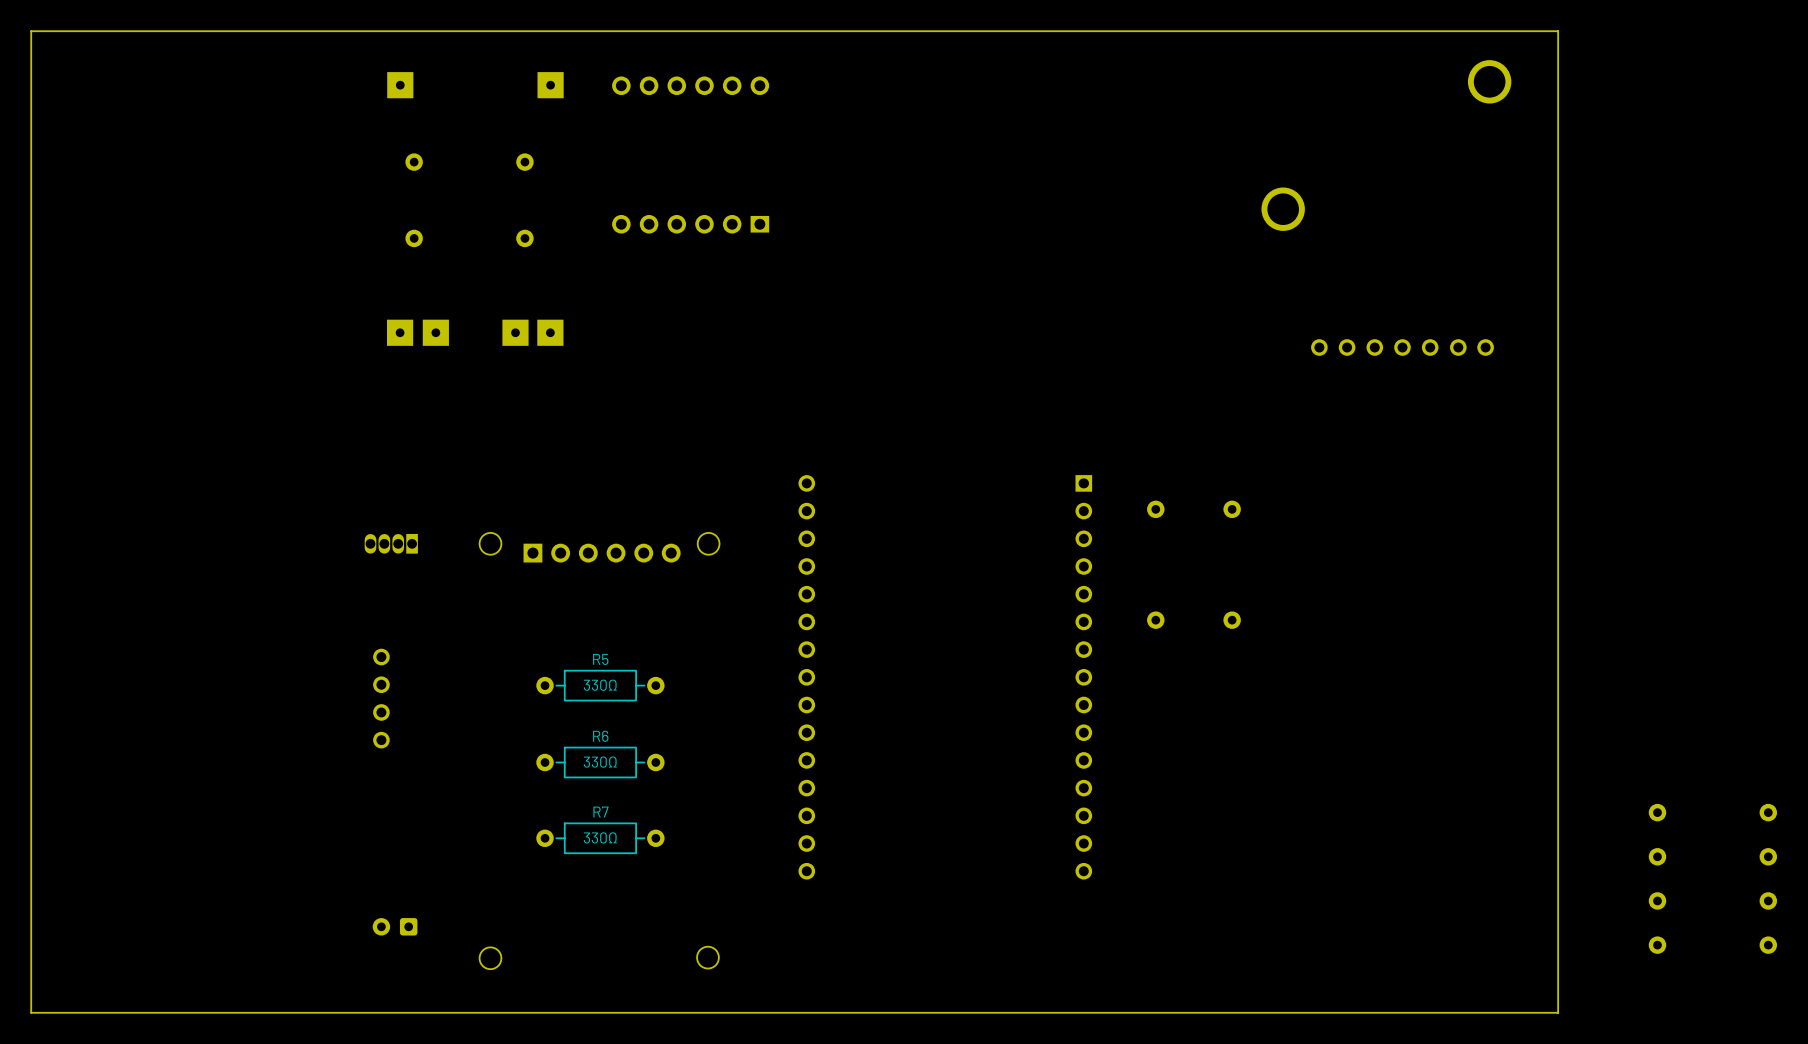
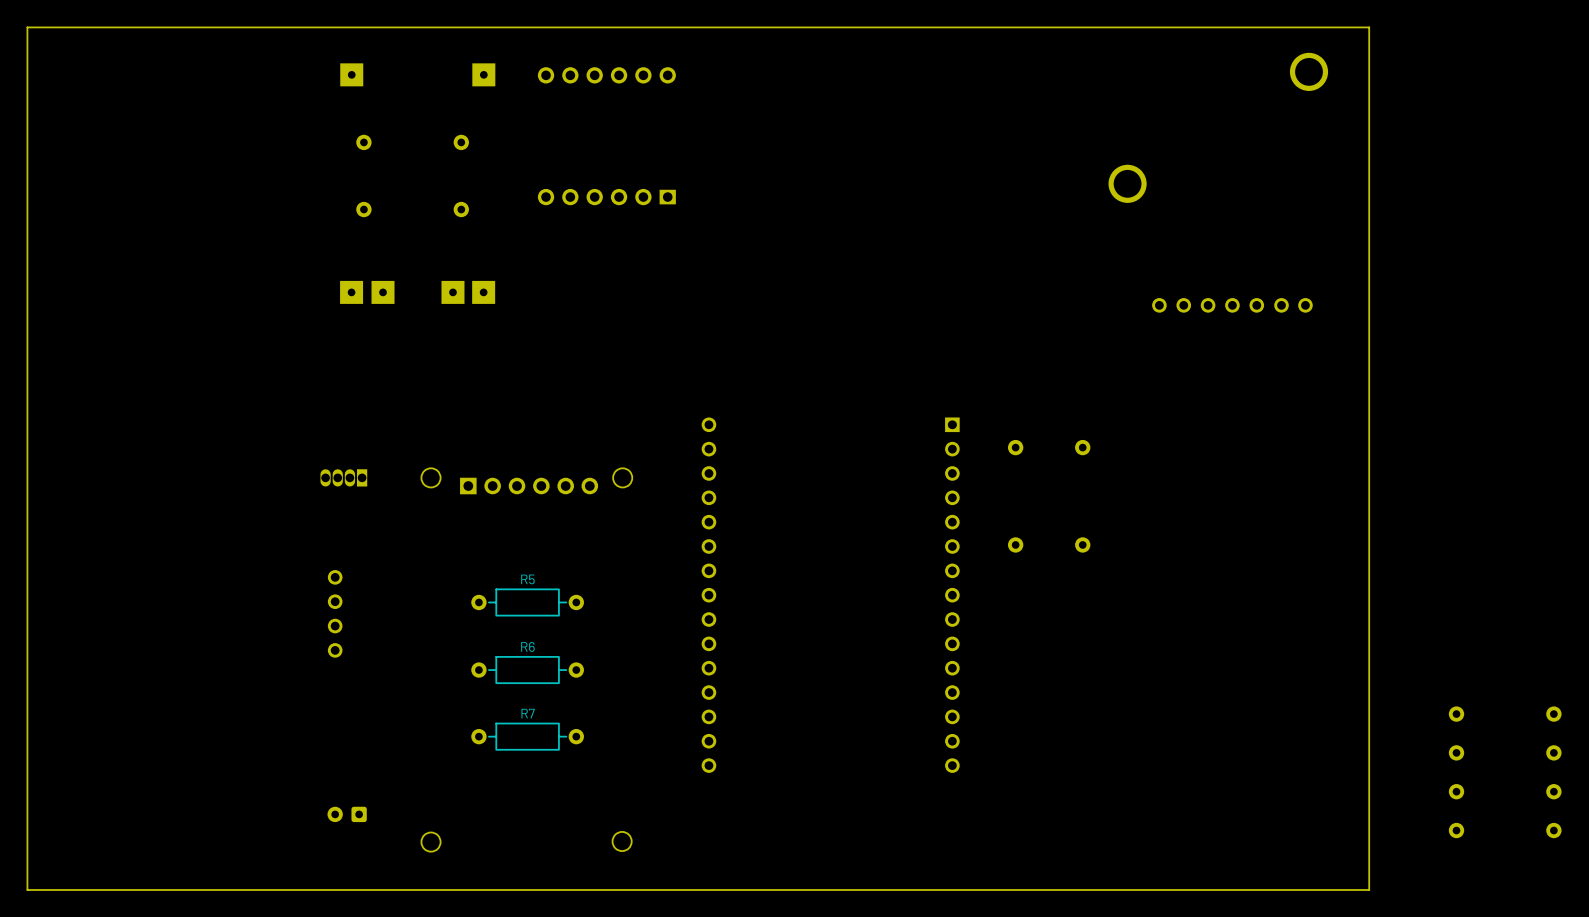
R5 text: 330Ω (600, 685) -> none
R6 text: 330Ω (600, 762) -> none
R7 text: 330Ω (600, 837) -> none

